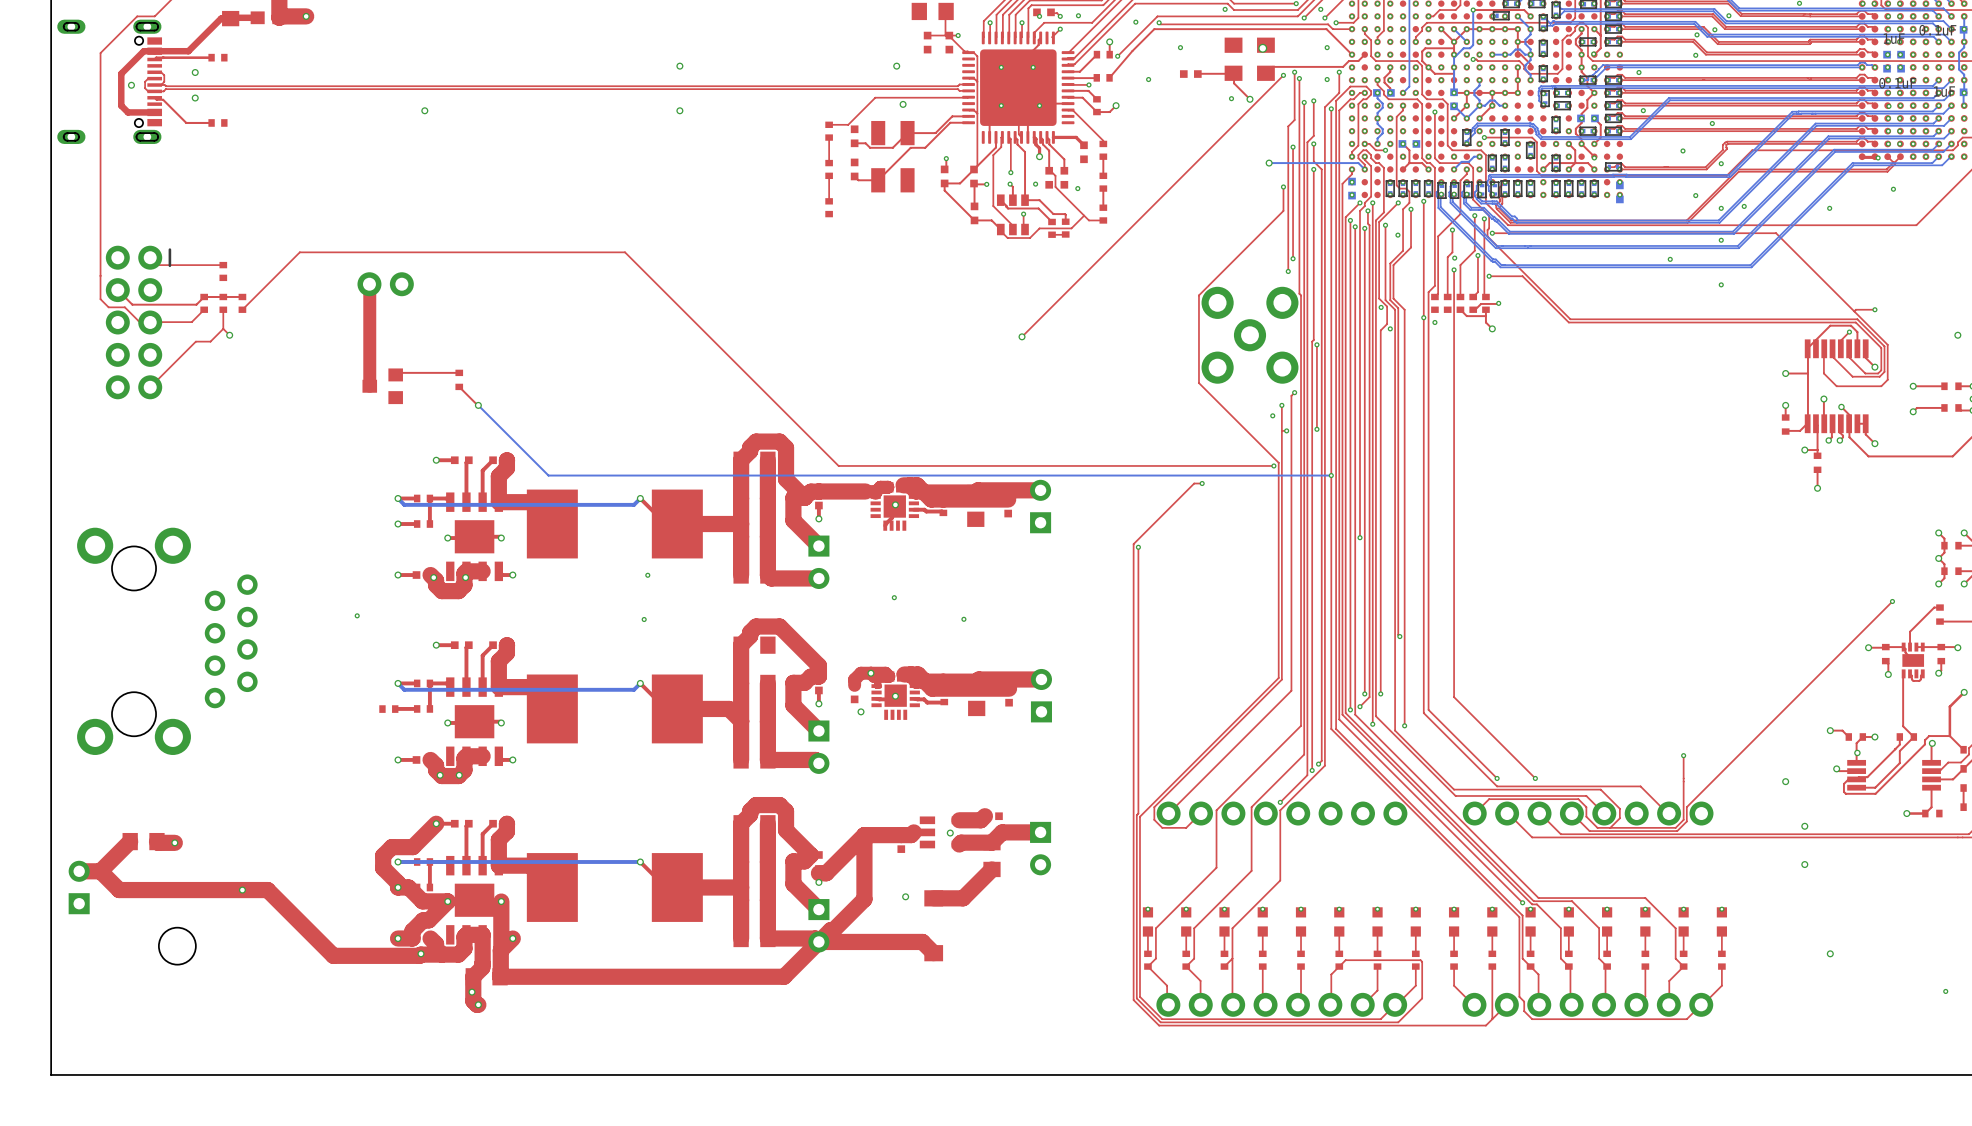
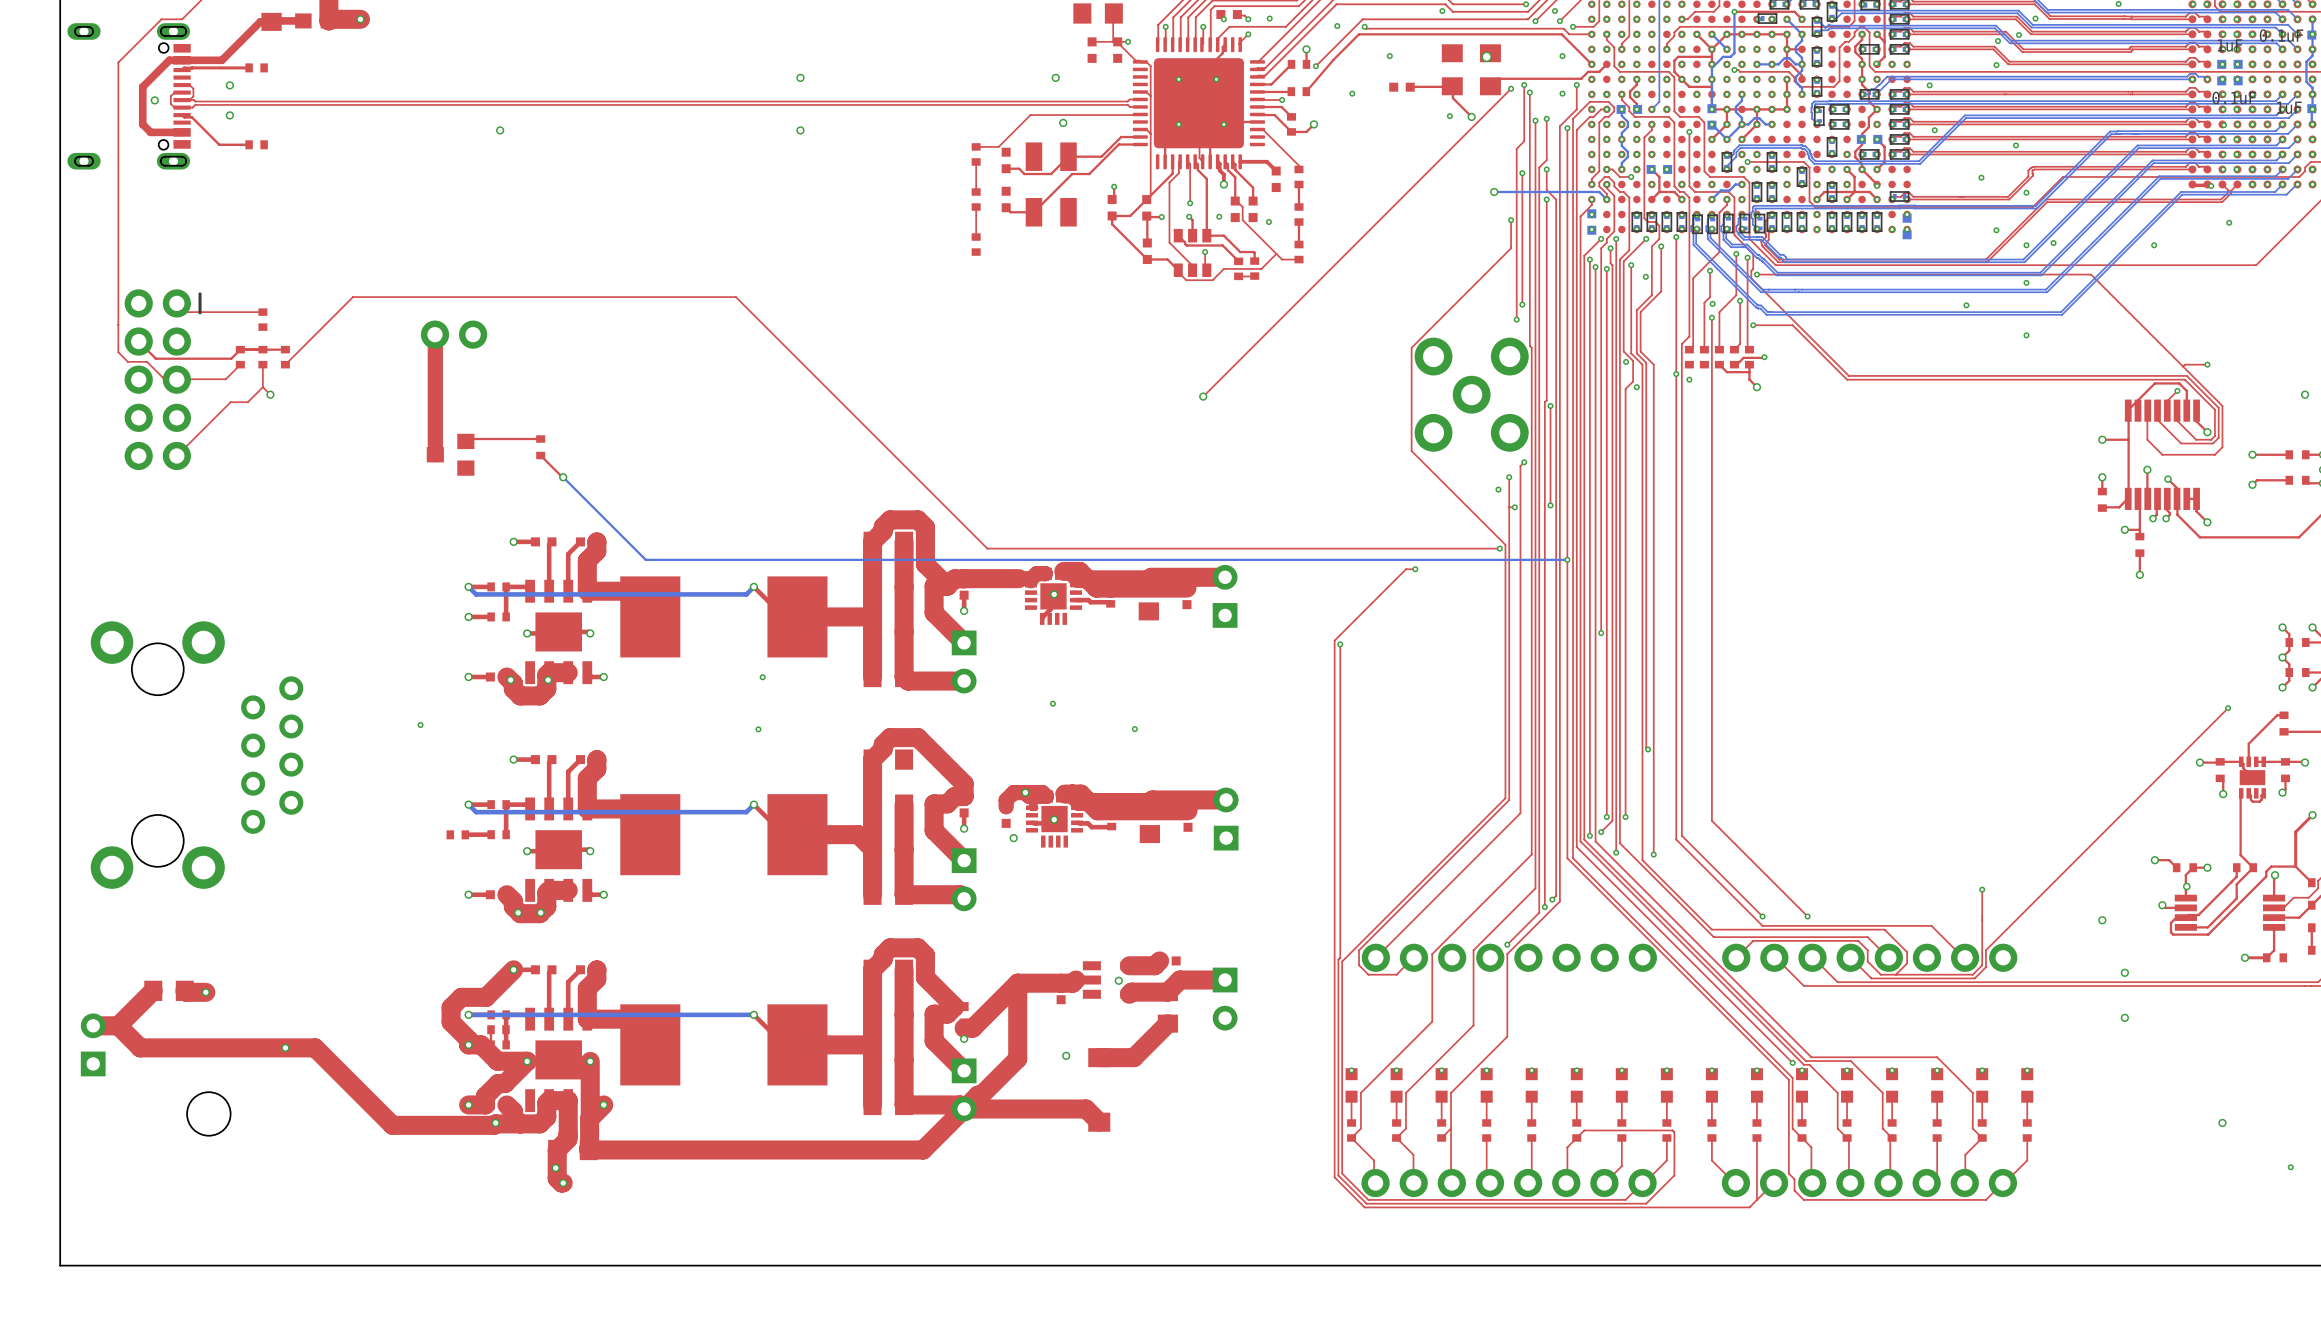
top track: none -> (490, 1029) (490, 1044)
part: none -> (498, 1029)
via position: (1830, 953) -> (2222, 1122)

